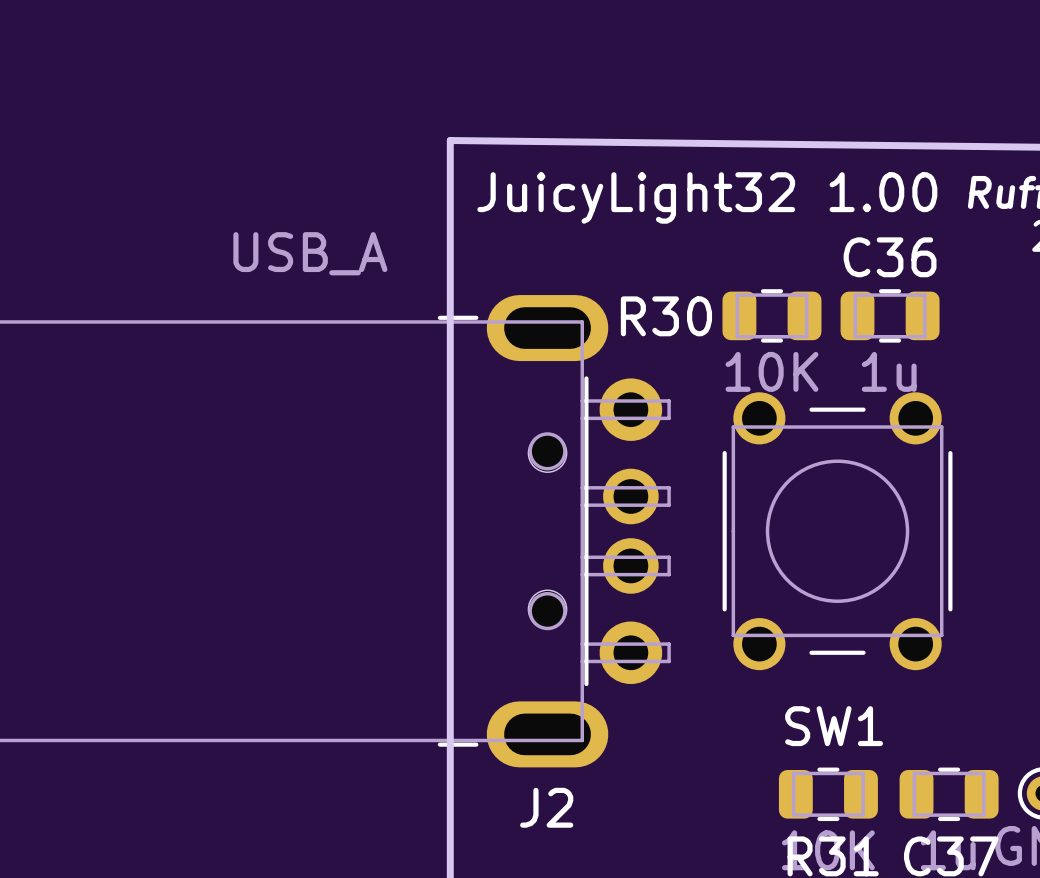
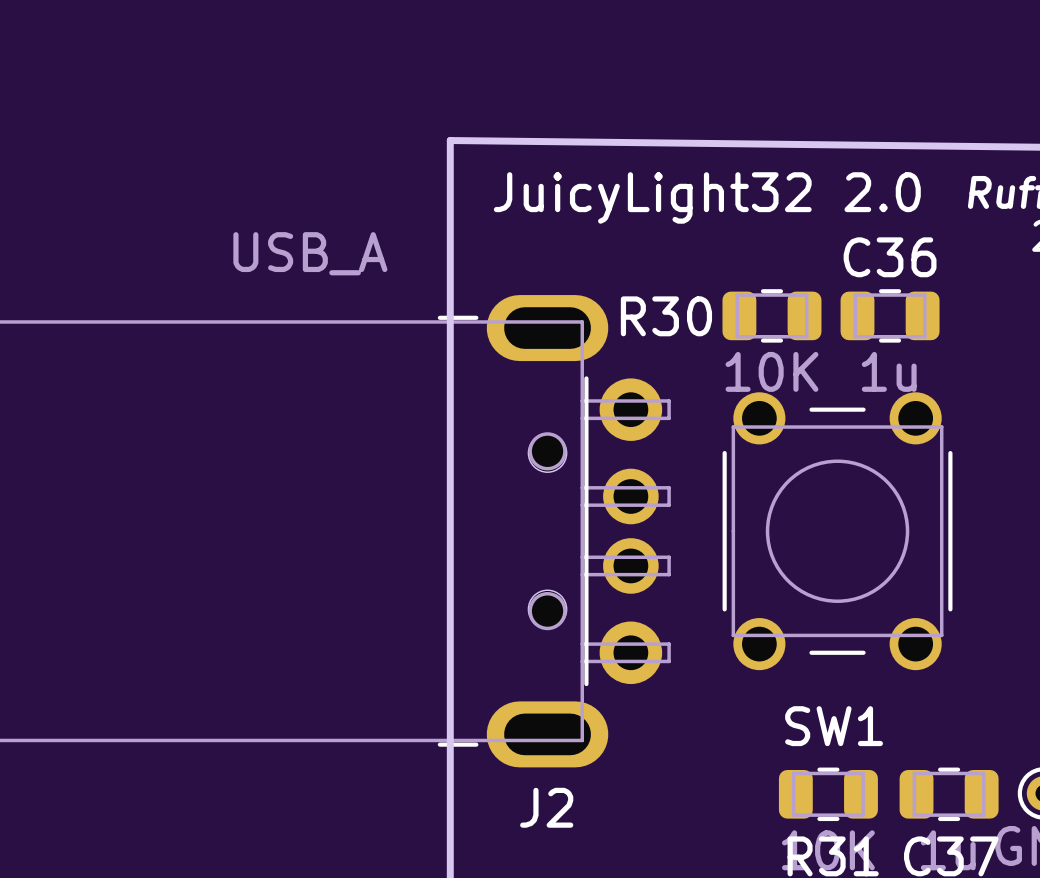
text: JuicyLight32 1.00 (707, 197) -> JuicyLight32 2.0 (707, 197)

